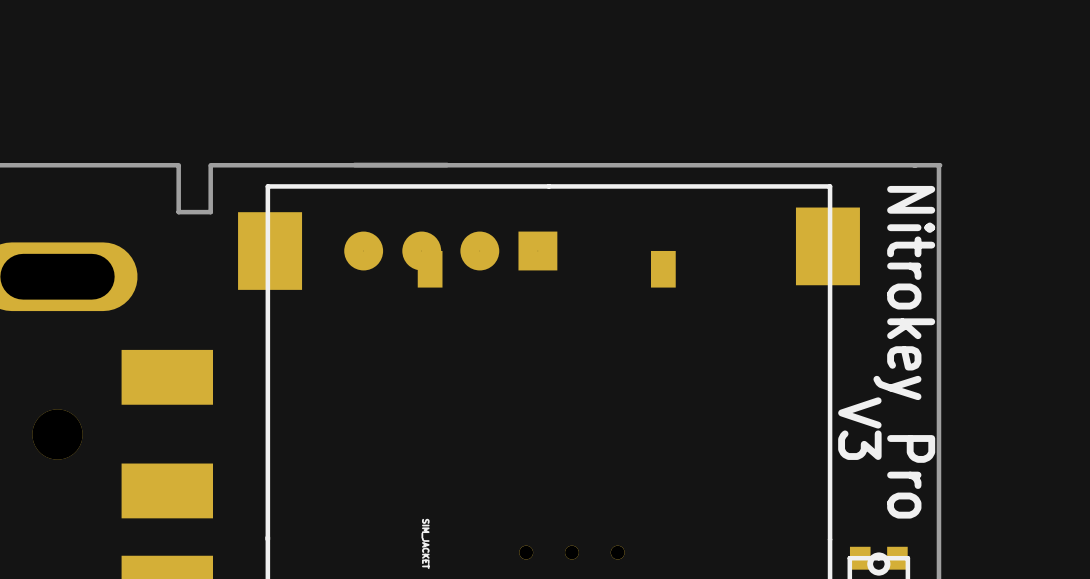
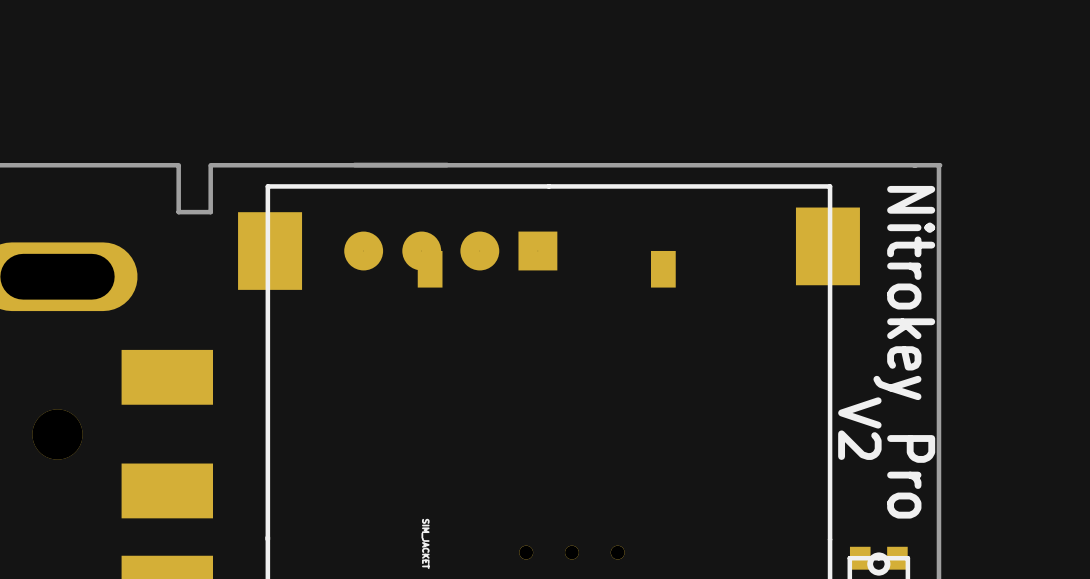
text: V3 (859, 428) -> V2 (859, 428)

